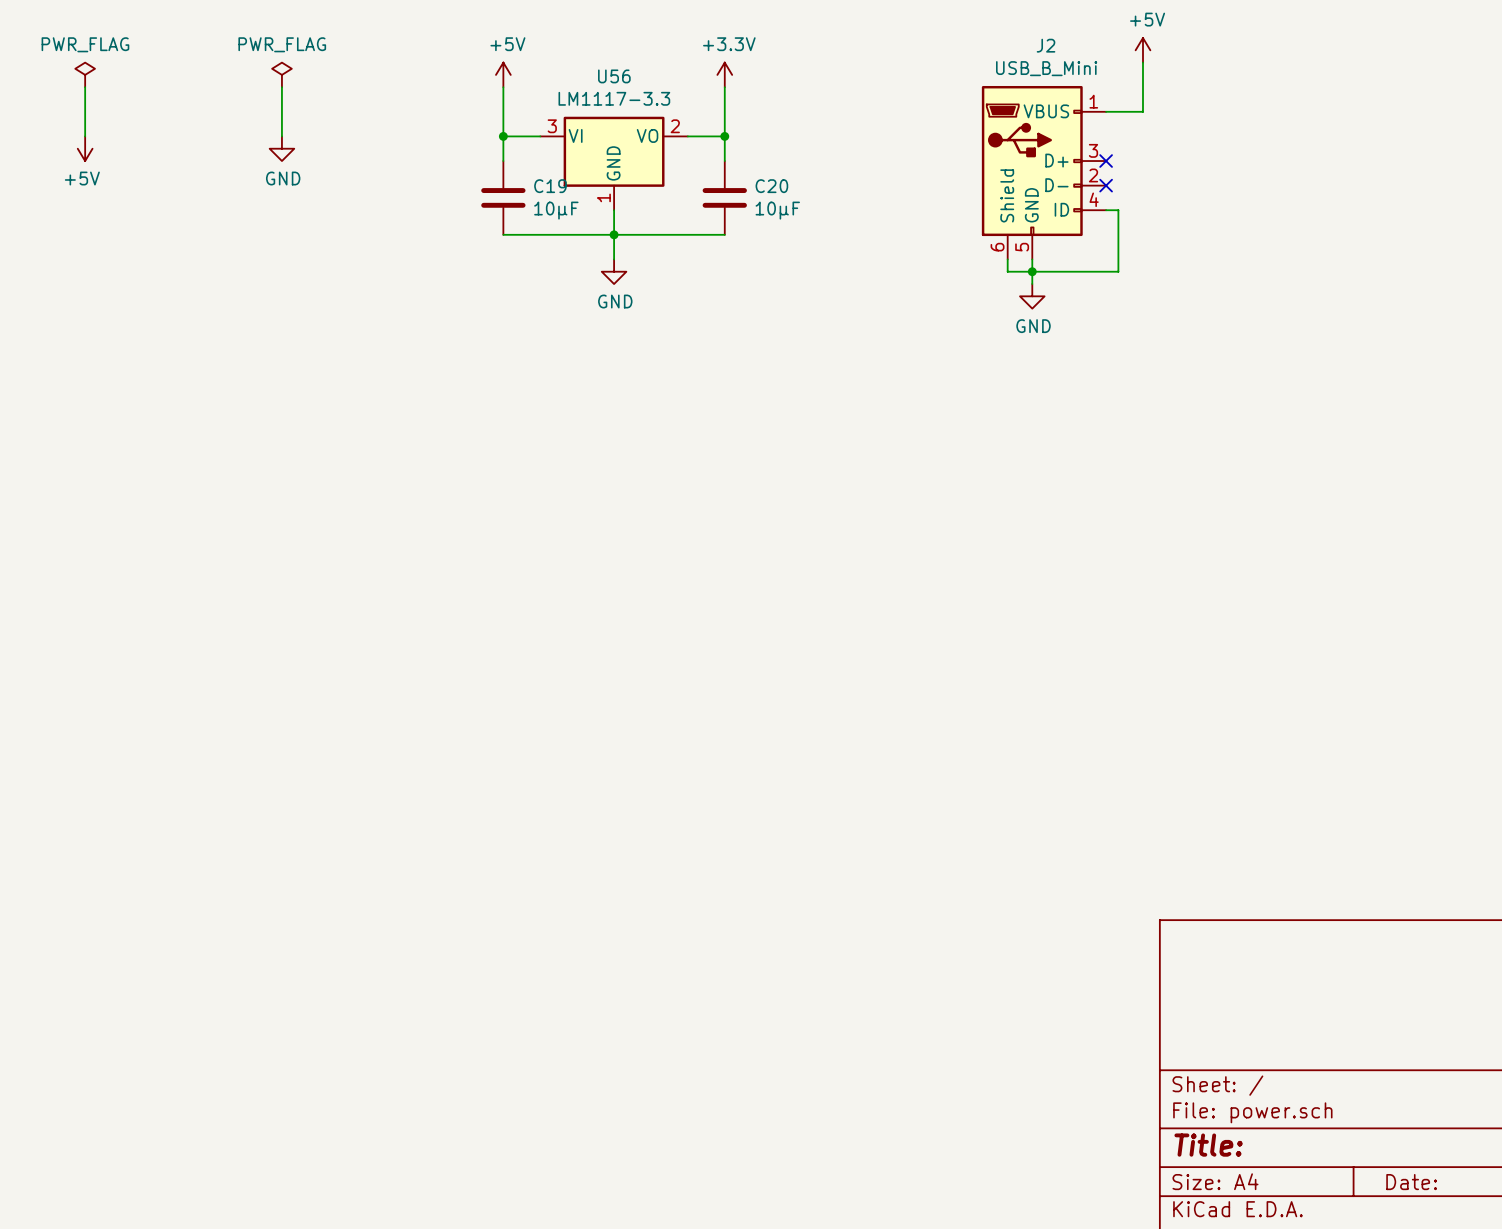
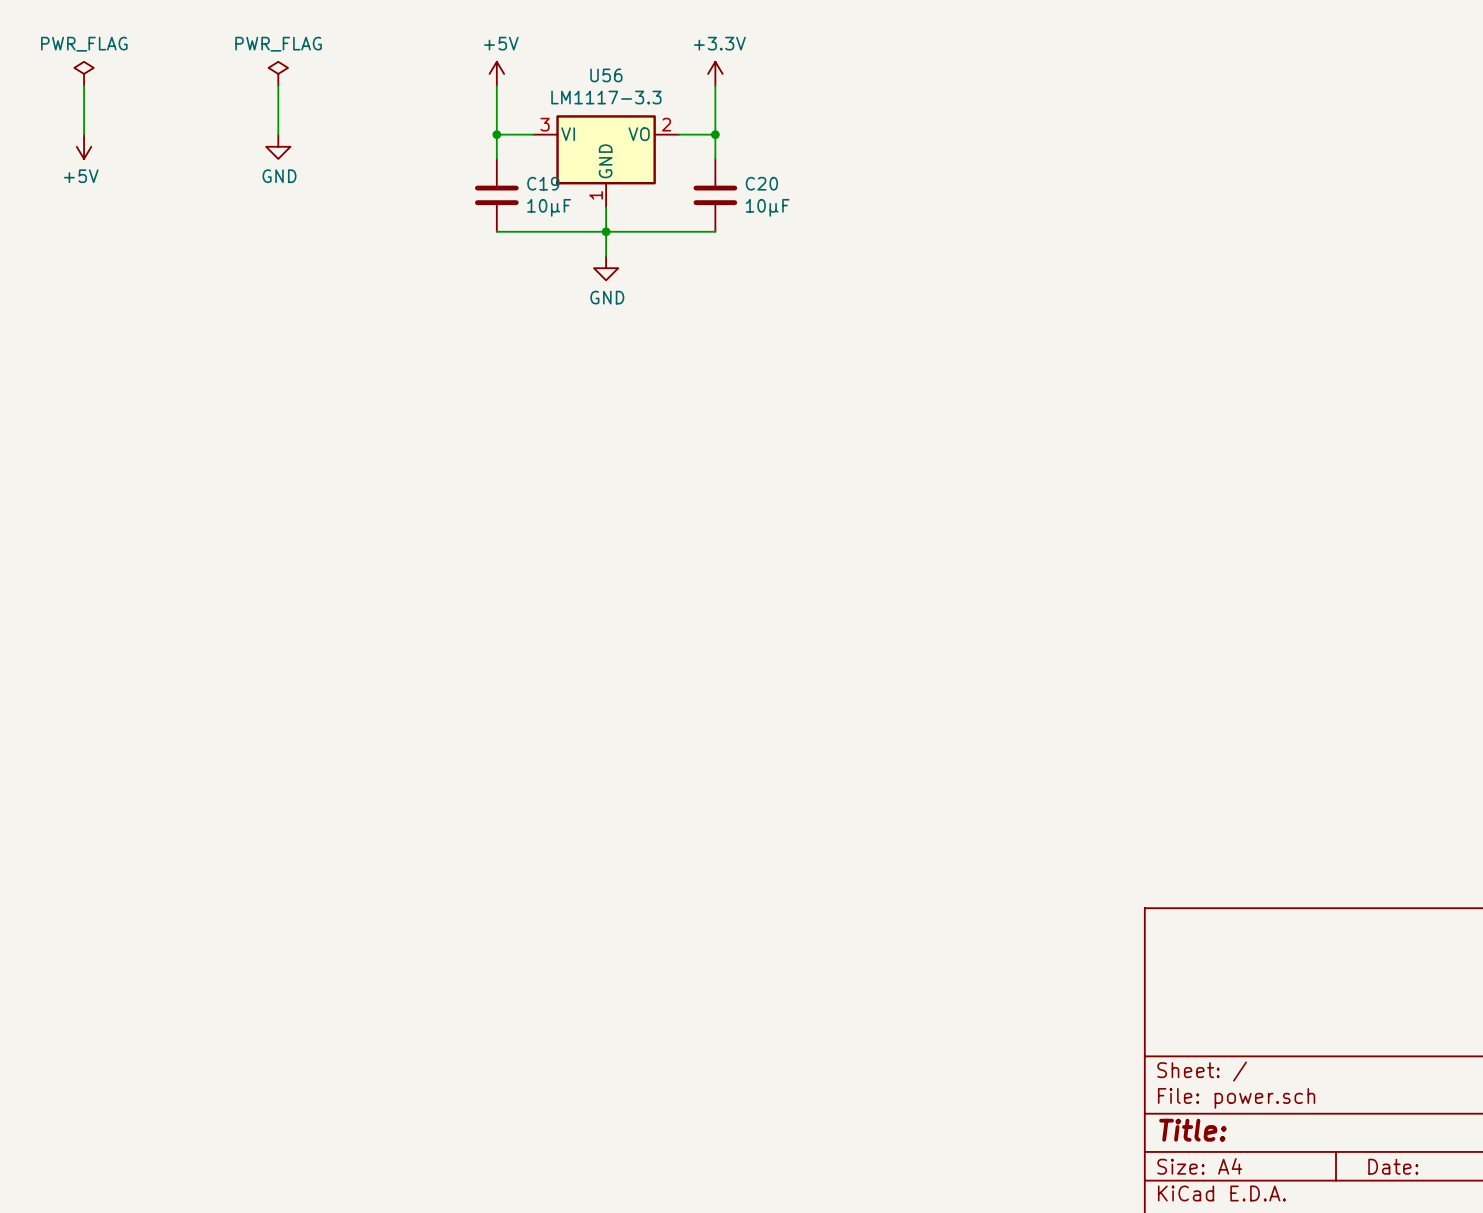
power symbol: +5V (1142, 50) -> none
wire: (1142, 62) (1142, 111) (1106, 111) -> none
no-connect mark: (1106, 161) -> none
J2: USB_B_Mini (1043, 172) -> none
no-connect mark: (1106, 185) -> none
wire: (1106, 210) (1118, 210) (1118, 271) (1007, 271) (1007, 259) -> none
wire: (1032, 259) (1032, 284) -> none
junction: (1032, 271) -> none
power symbol: GND (1032, 296) -> none

